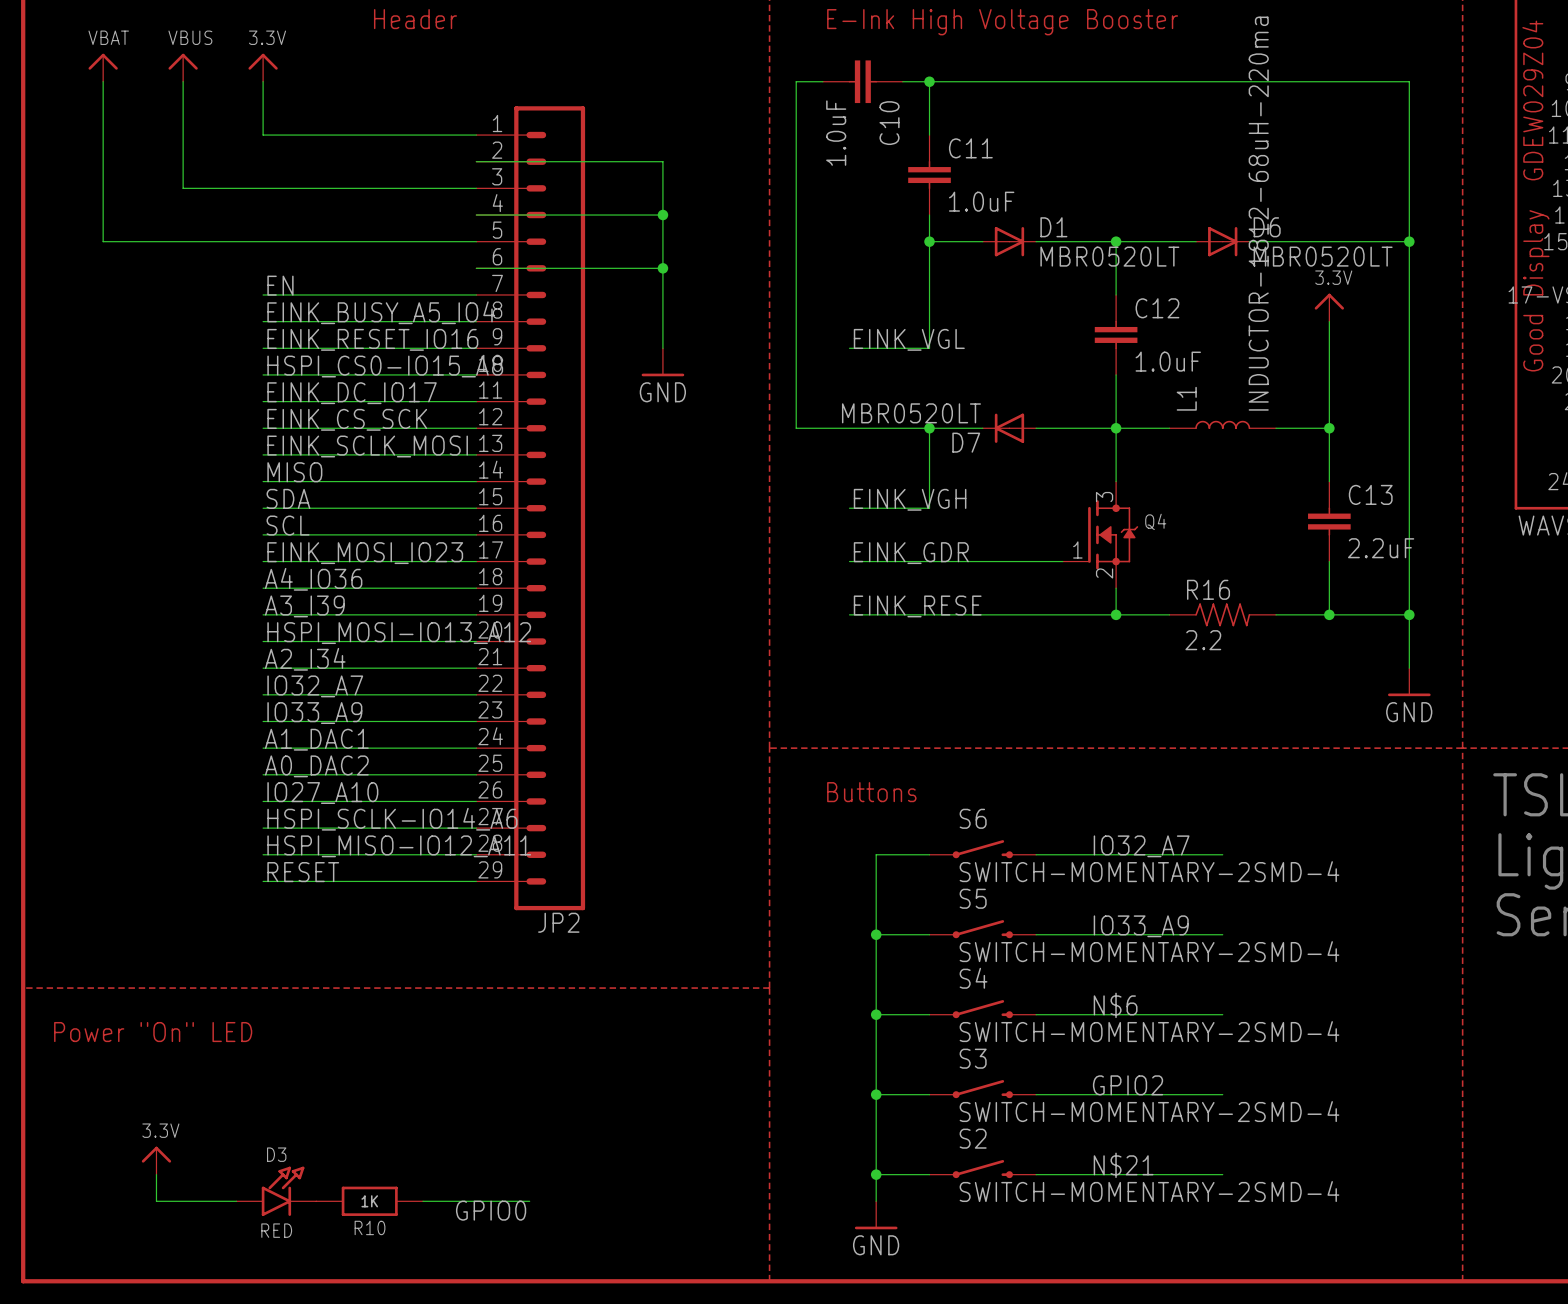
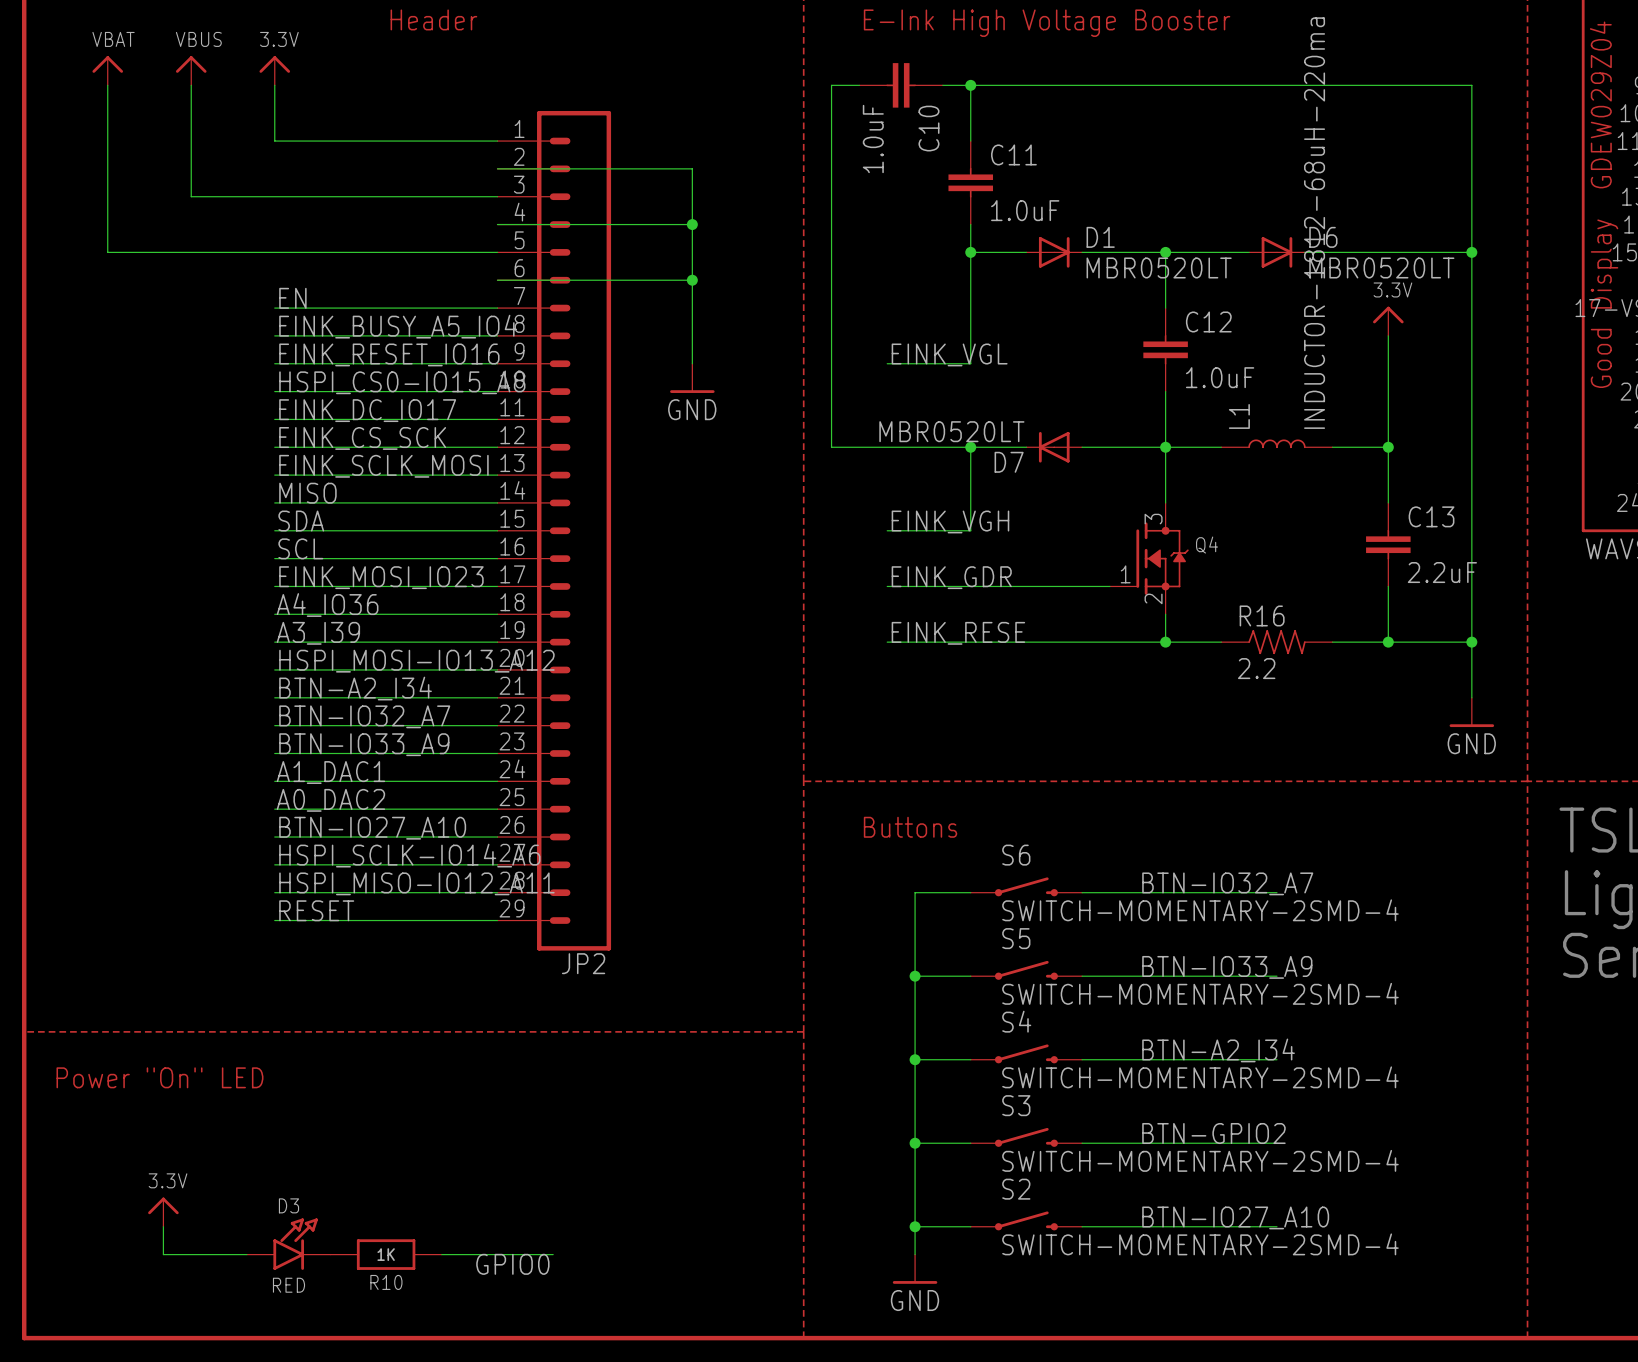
label: A2_I34 (305, 659) -> BTN-A2_I34 (355, 688)
label: IO32_A7 (315, 686) -> BTN-IO32_A7 (364, 716)
label: IO33_A9 (314, 713) -> BTN-IO33_A9 (364, 744)
label: IO27_A10 (322, 793) -> BTN-IO27_A10 (372, 828)
label: IO32_A7 (1141, 846) -> BTN-IO32_A7 (1227, 883)
label: IO33_A9 (1141, 926) -> BTN-IO33_A9 (1227, 967)
label: N$6 (1115, 1005) -> BTN-A2_I34 (1218, 1050)
label: GPIO2 (1128, 1085) -> BTN-GPIO2 (1213, 1133)
label: N$21 (1123, 1165) -> BTN-IO27_A10 (1235, 1217)

